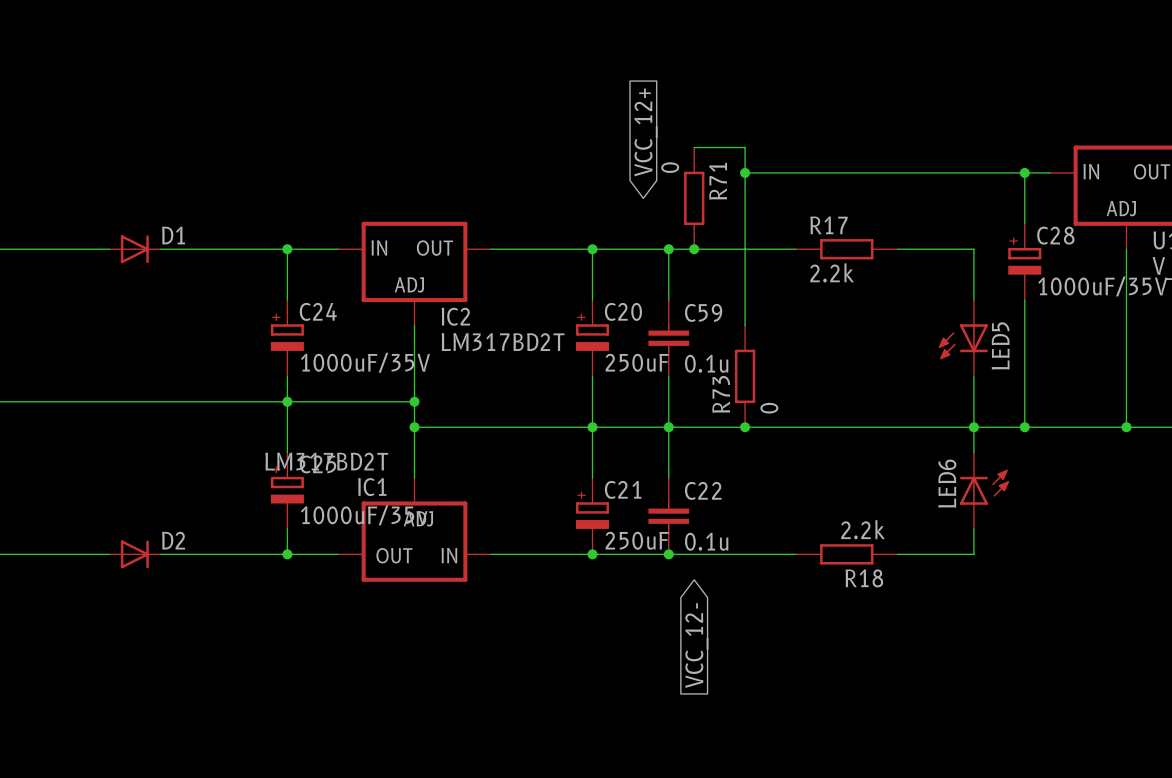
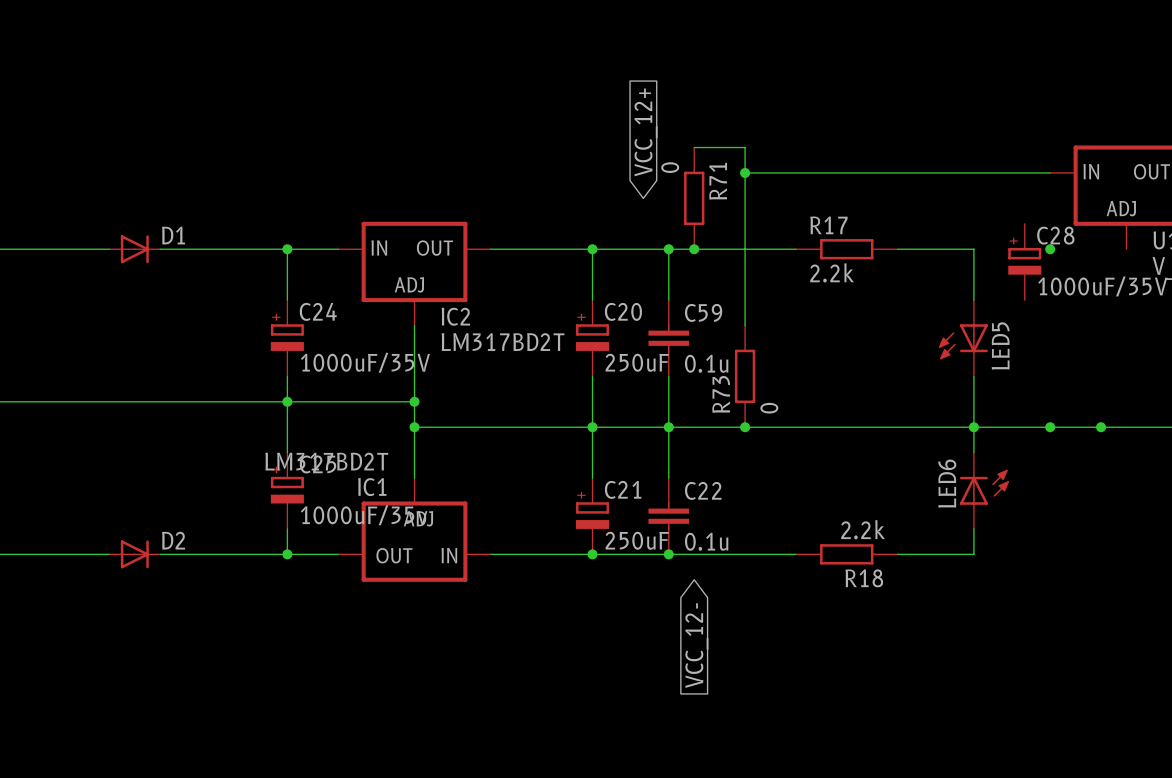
wire: (1024, 172) (1024, 223) -> none
junction: (1024, 172) -> none
junction: none -> (1050, 249)
wire: (1126, 249) (1126, 427) -> none
wire: (1024, 300) (1024, 427) -> none
junction position: (1024, 427) -> (1050, 427)
junction position: (1126, 427) -> (1101, 427)

